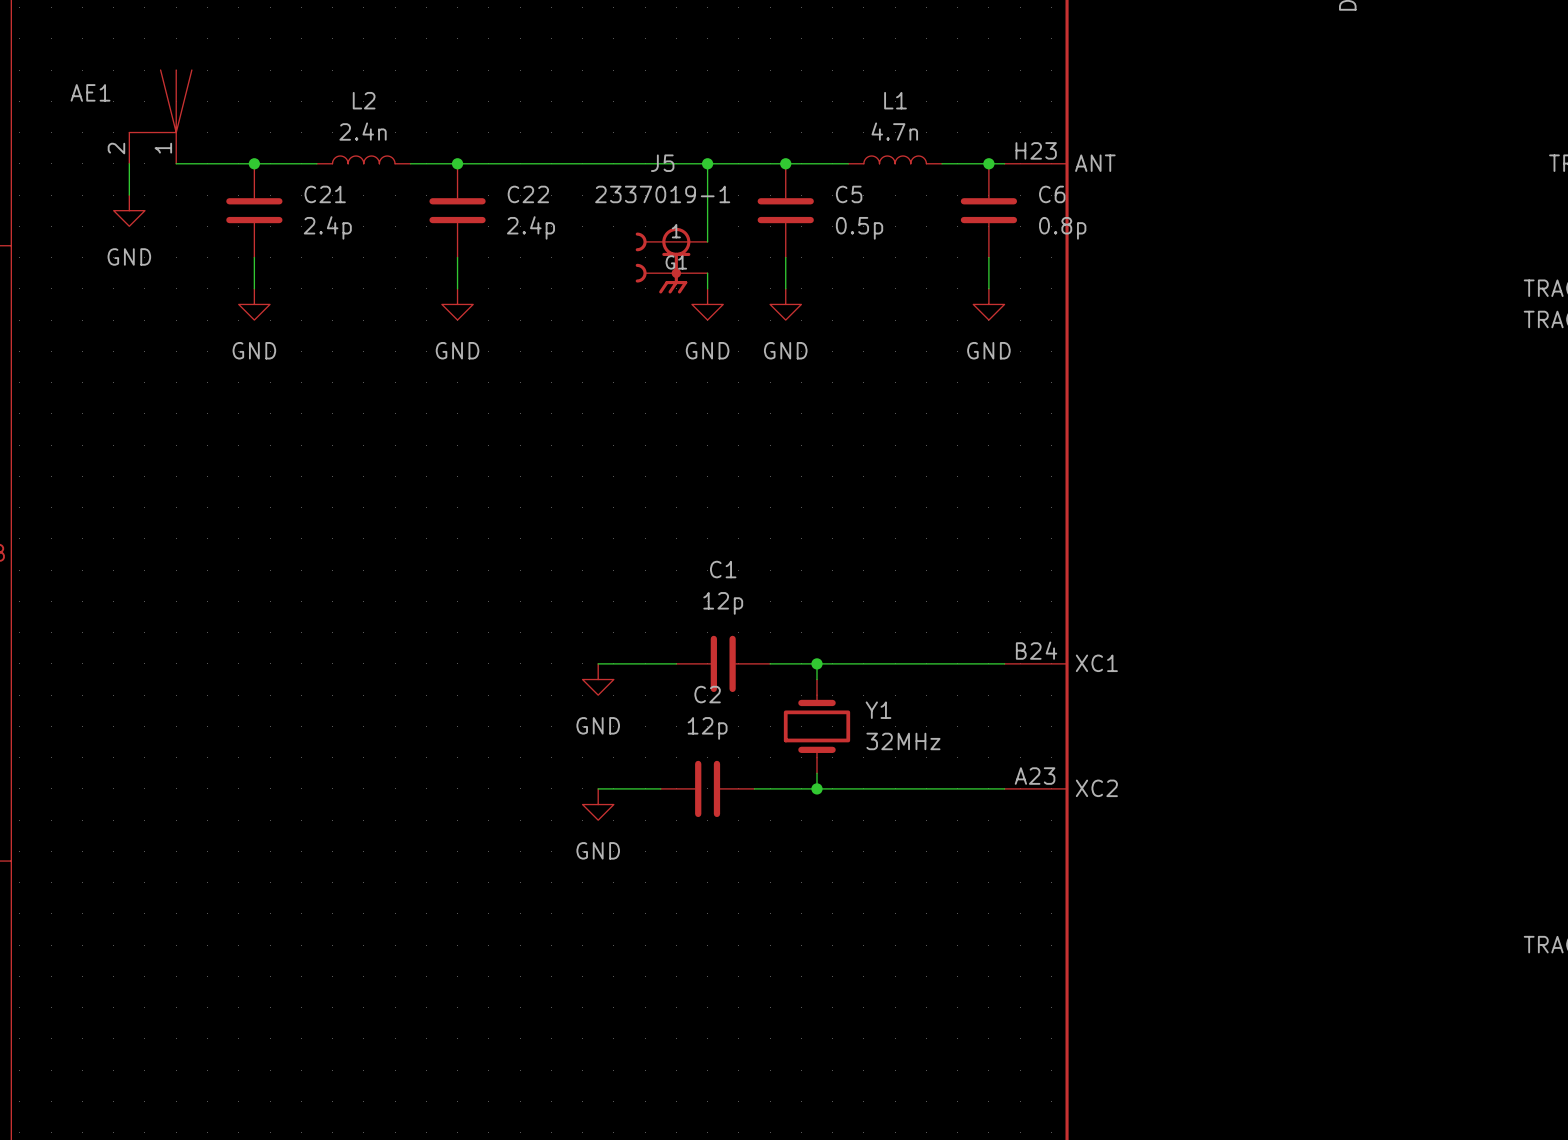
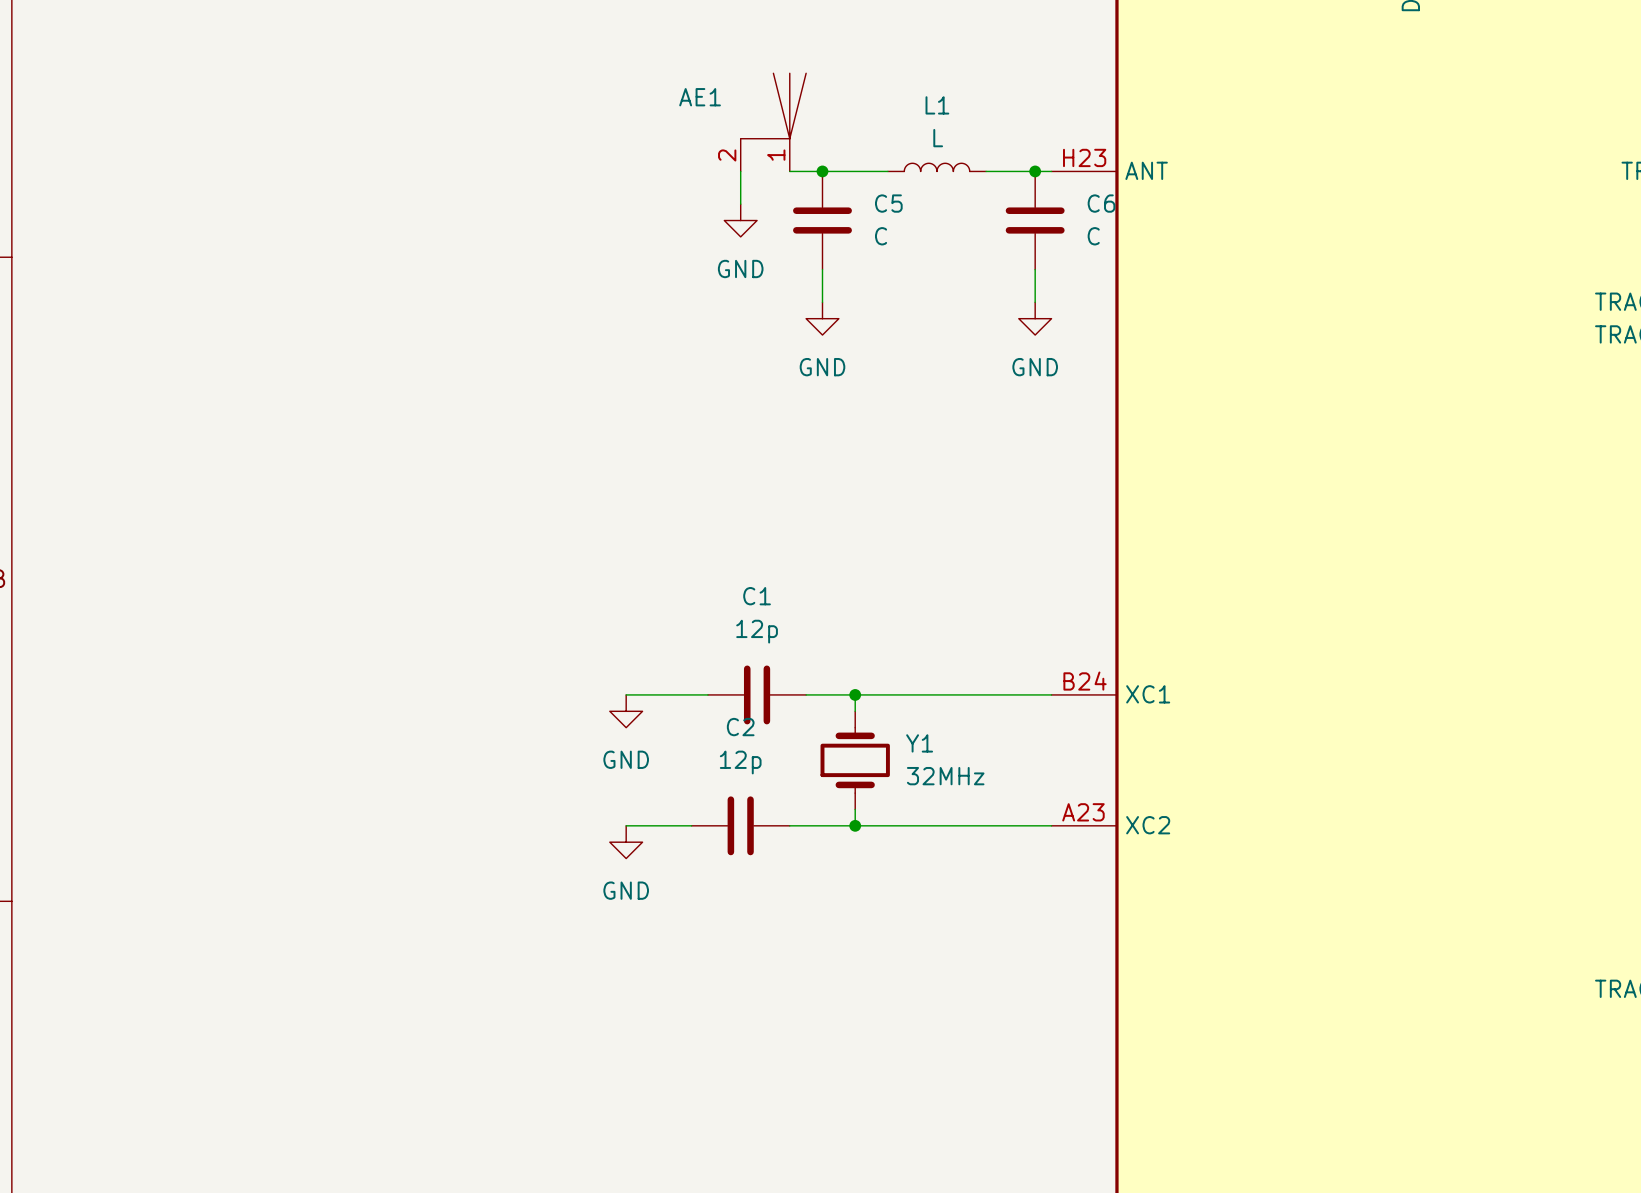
AE1 position: (160, 116) -> (773, 122)
L1 value: 4.7n (894, 131) -> L (938, 138)
L2: 2.4n (363, 159) -> none
wire: (129, 163) (129, 195) -> none
wire: (176, 163) (316, 163) -> none
junction: (254, 163) -> none
wire: (410, 163) (754, 163) -> none
junction: (457, 163) -> none
junction: (707, 163) -> none
wire: (707, 195) (707, 241) -> none
power symbol: GND (129, 210) -> none
C21: 2.4p (254, 210) -> none
C22: 2.4p (457, 210) -> none
C5 value: 0.5p (859, 228) -> C (881, 236)
C6 value: 0.8p (1062, 228) -> C (1093, 236)
wire: (254, 257) (254, 288) -> none
wire: (457, 257) (457, 288) -> none
J5: 2337019-1 (671, 260) -> none
wire: (707, 273) (707, 288) -> none
power symbol: GND (254, 304) -> none
power symbol: GND (457, 304) -> none
power symbol position: GND (707, 304) -> GND (740, 220)

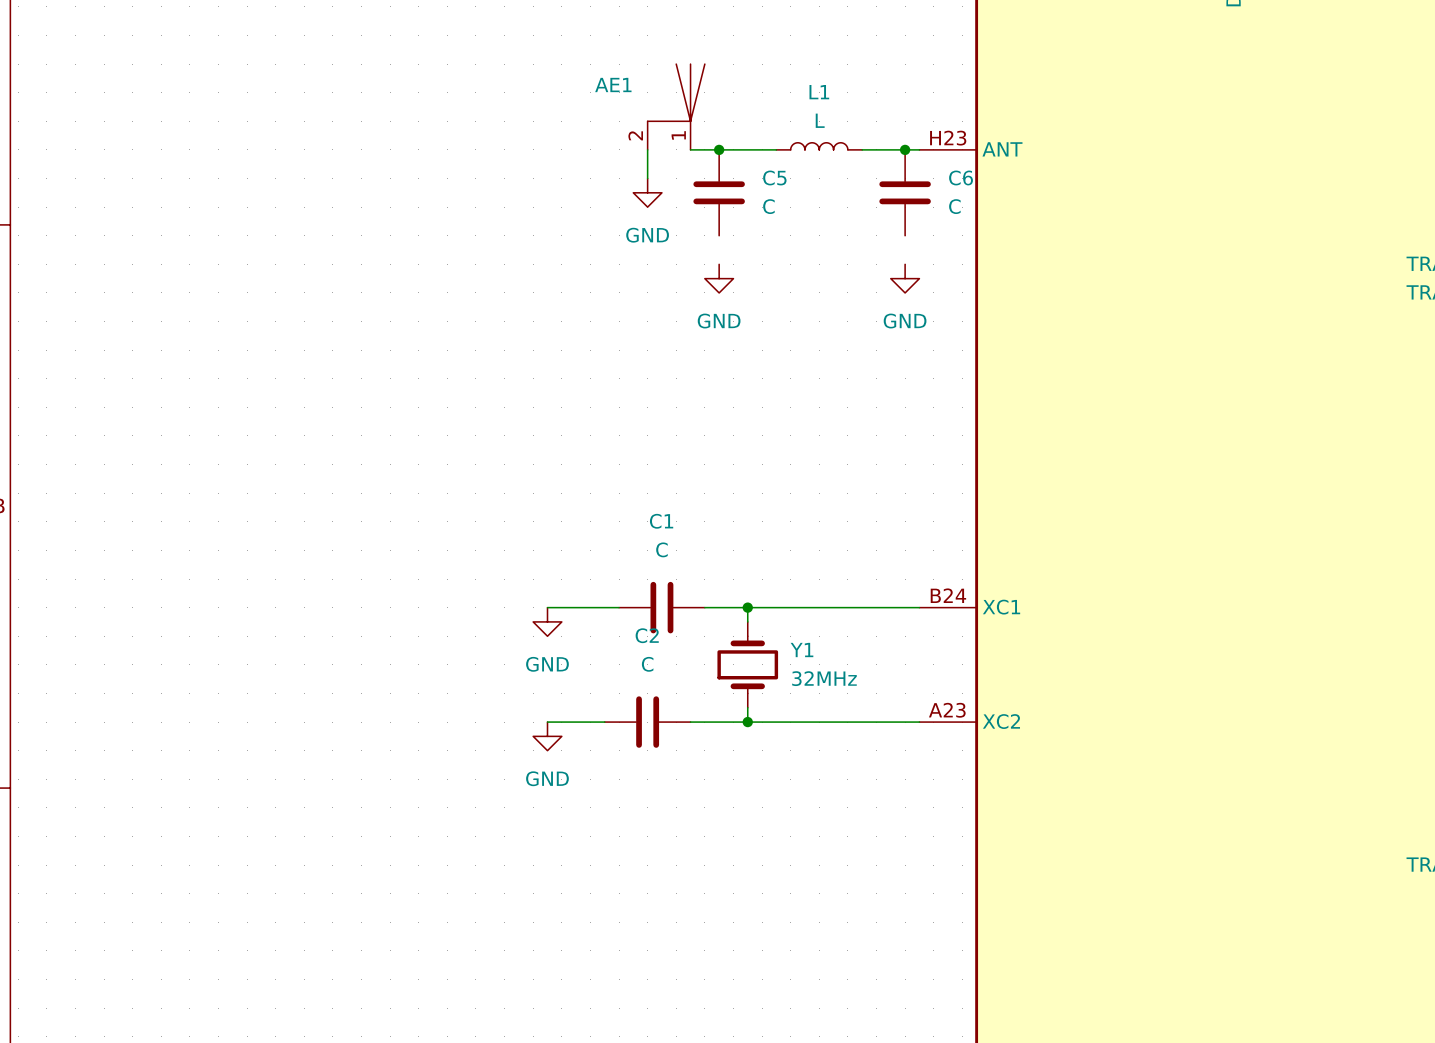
wire: (822, 269) (822, 302) -> none
wire: (1035, 269) (1035, 302) -> none
C1 value: 12p (757, 631) -> C (661, 549)
C2 value: 12p (740, 762) -> C (647, 664)

